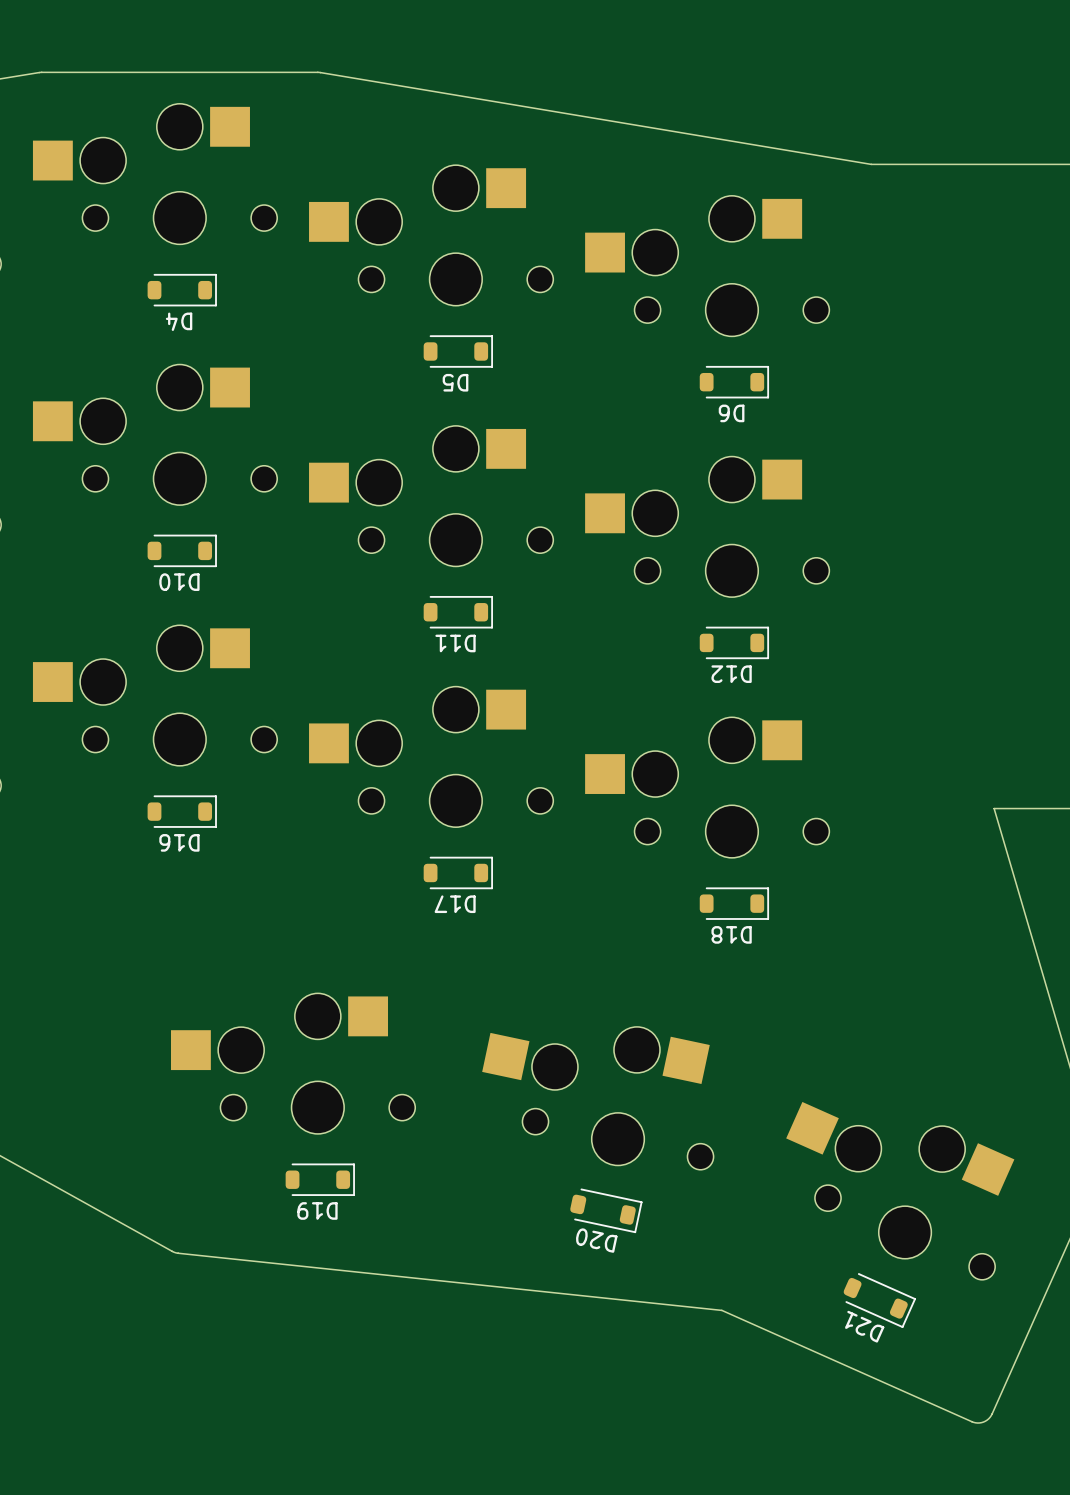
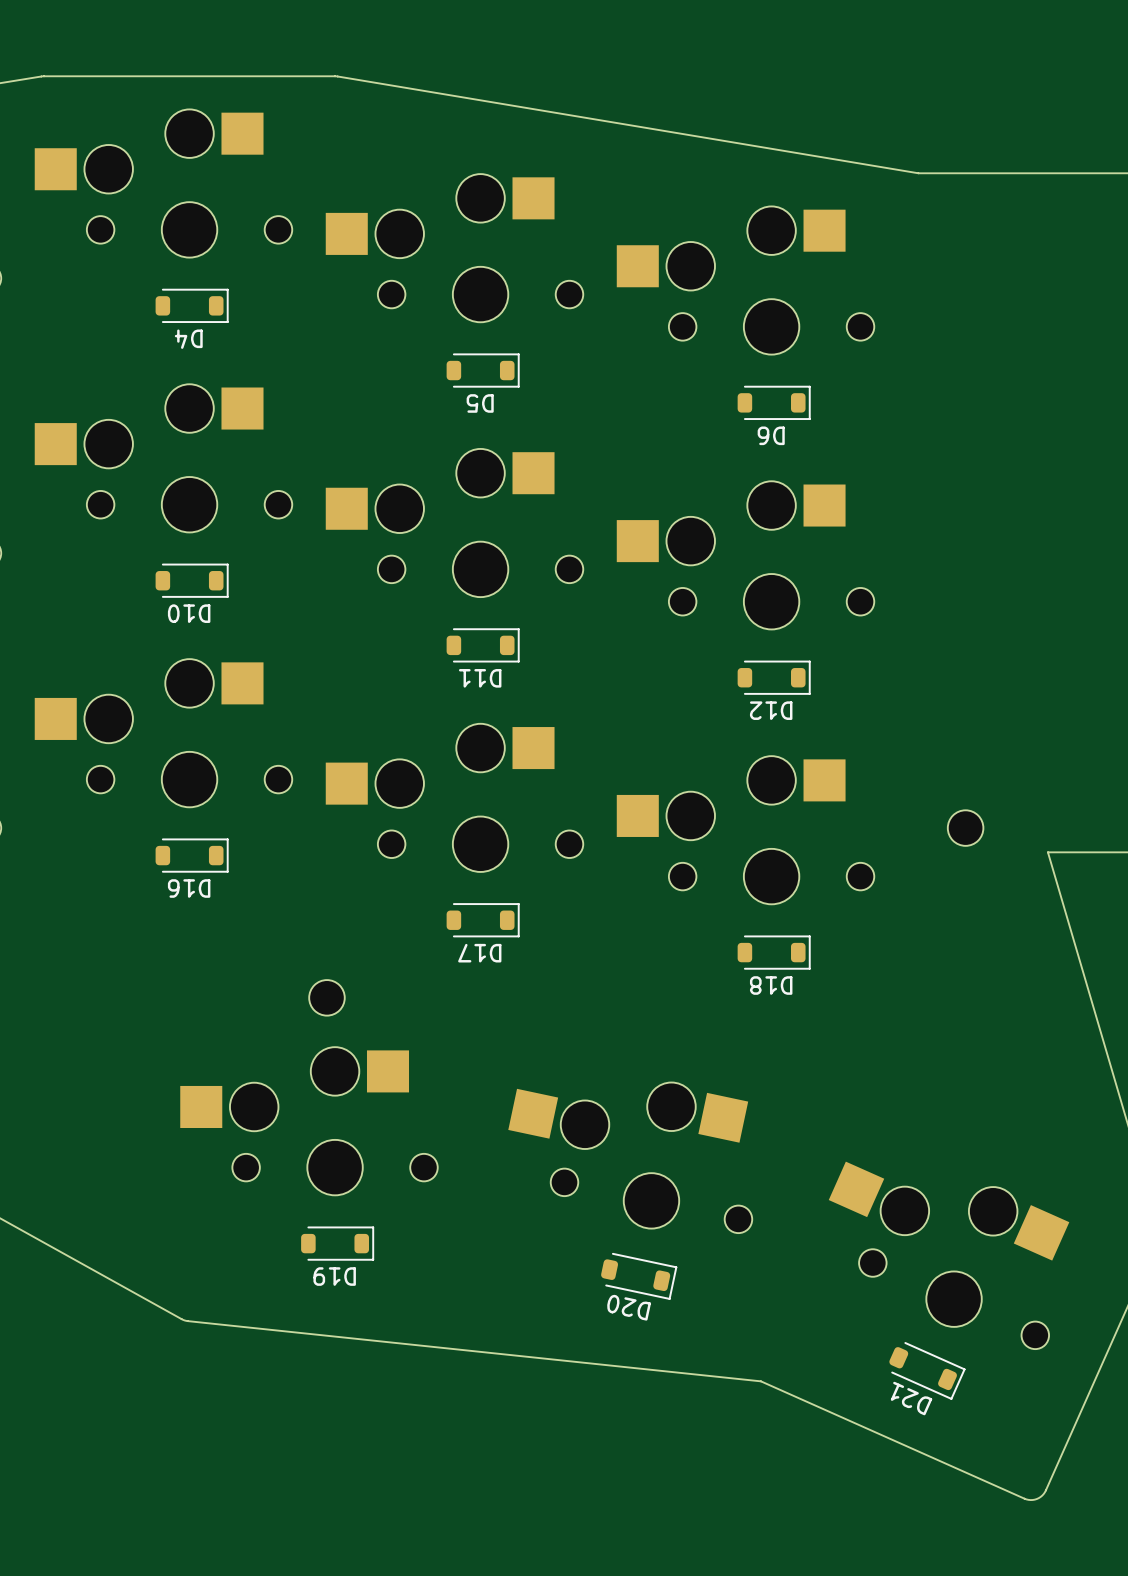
part: none -> (965, 828)
part: none -> (326, 997)

